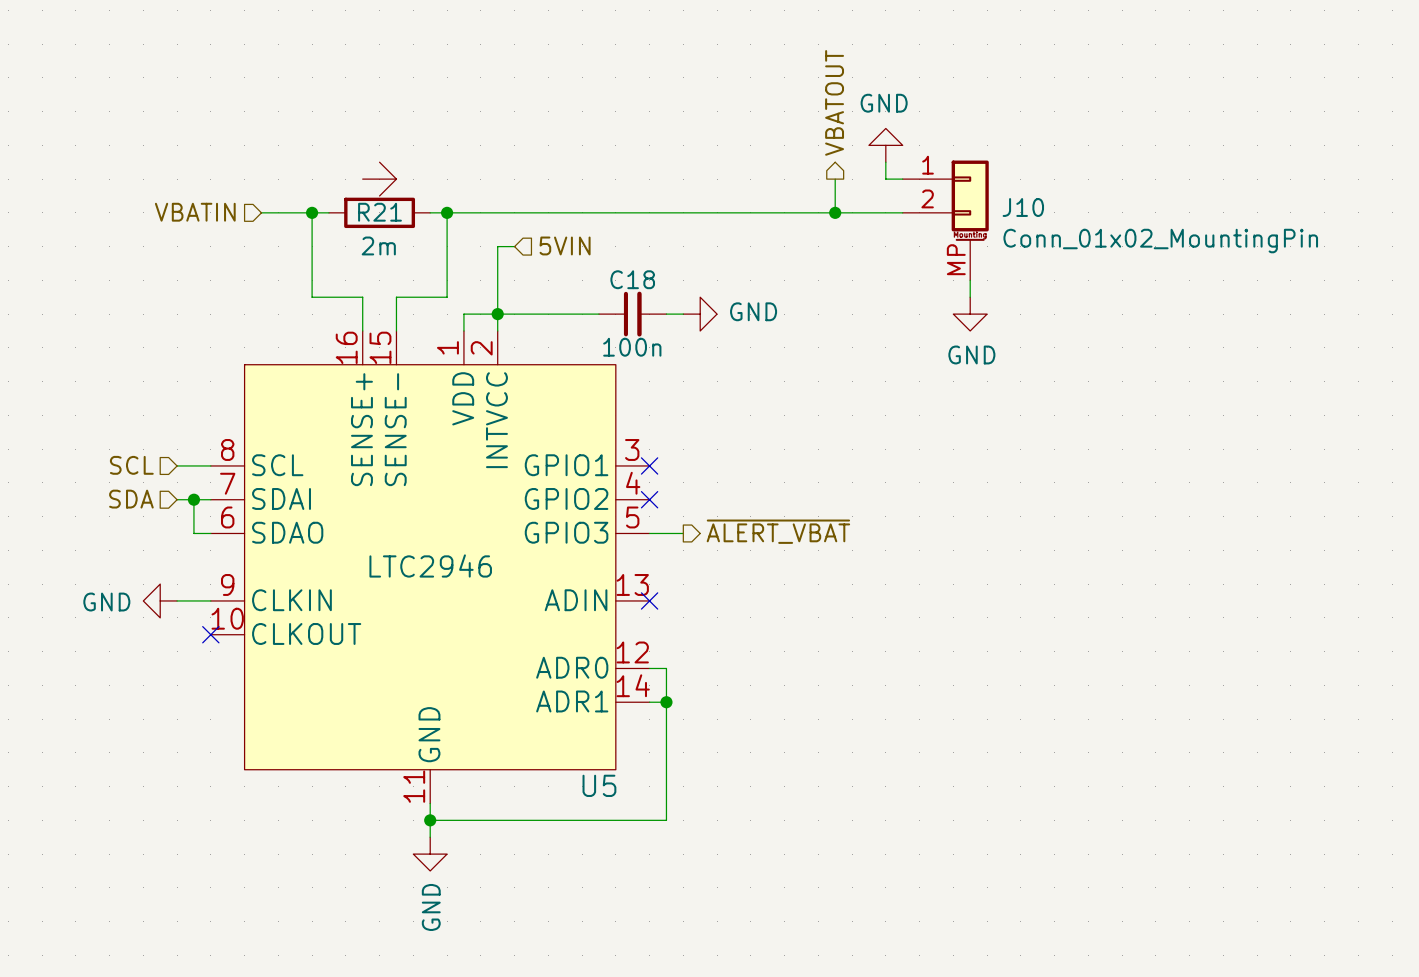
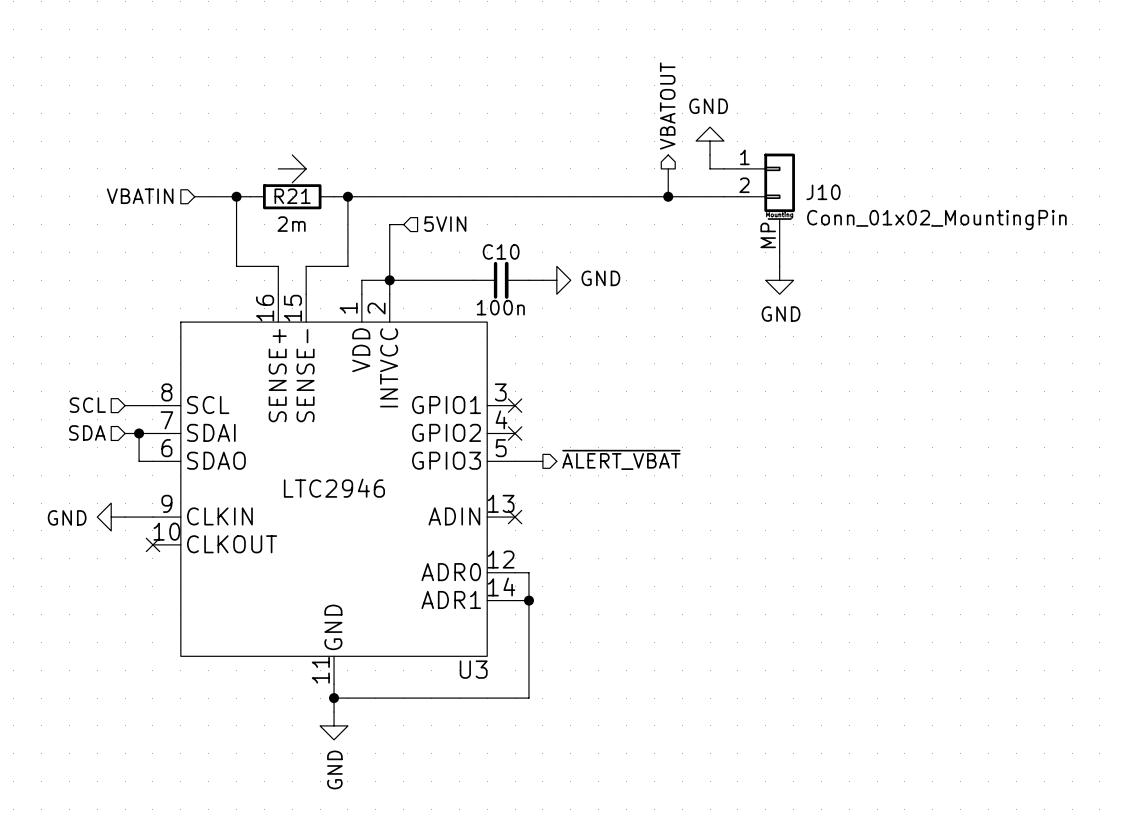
C18 name: C18 (632, 279) -> C10 (501, 251)
U5 name: U5 (599, 785) -> U3 (473, 669)

